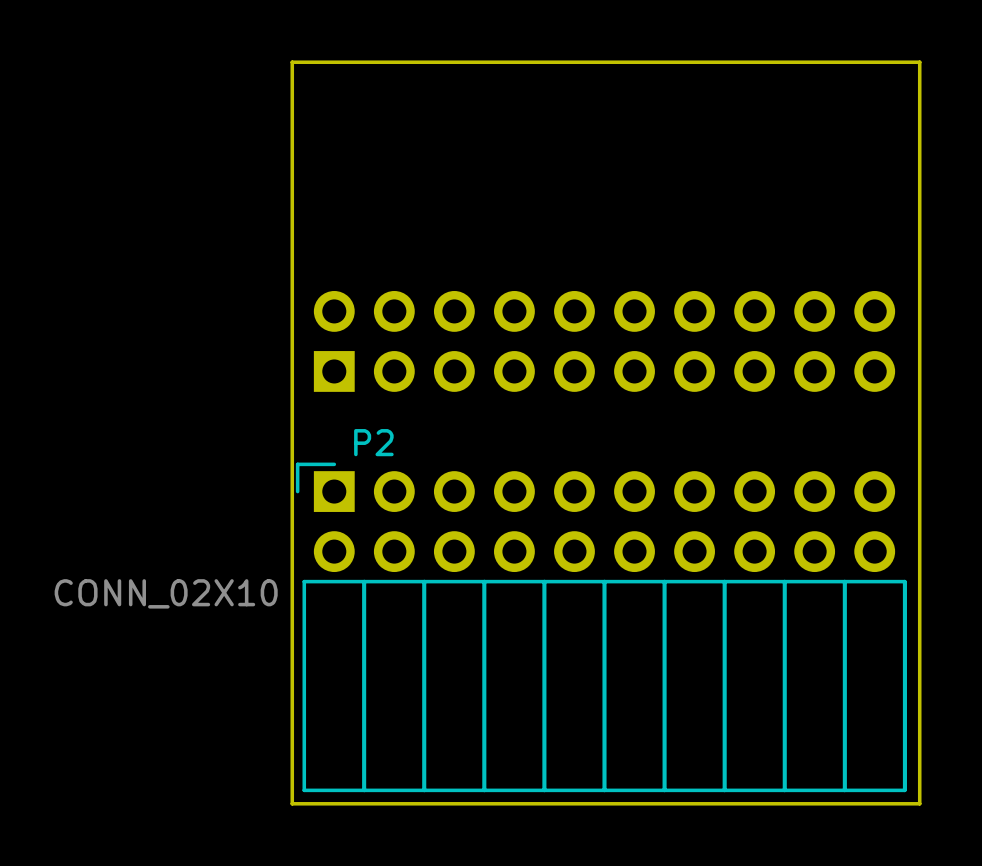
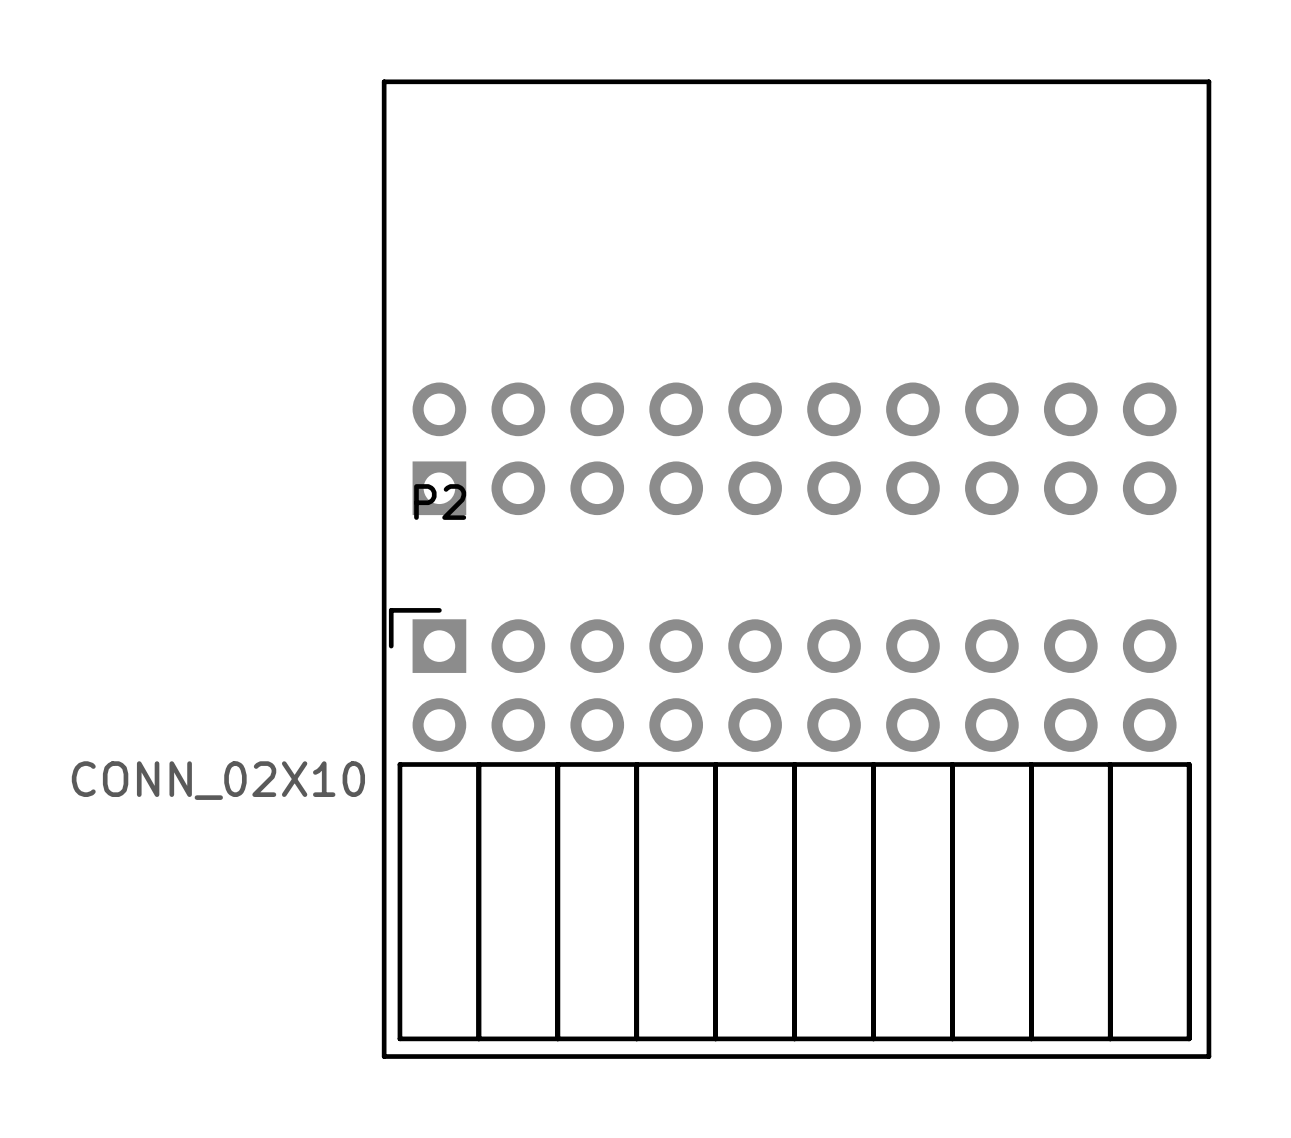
P2 name position: P2 (373, 442) -> P2 (440, 502)

